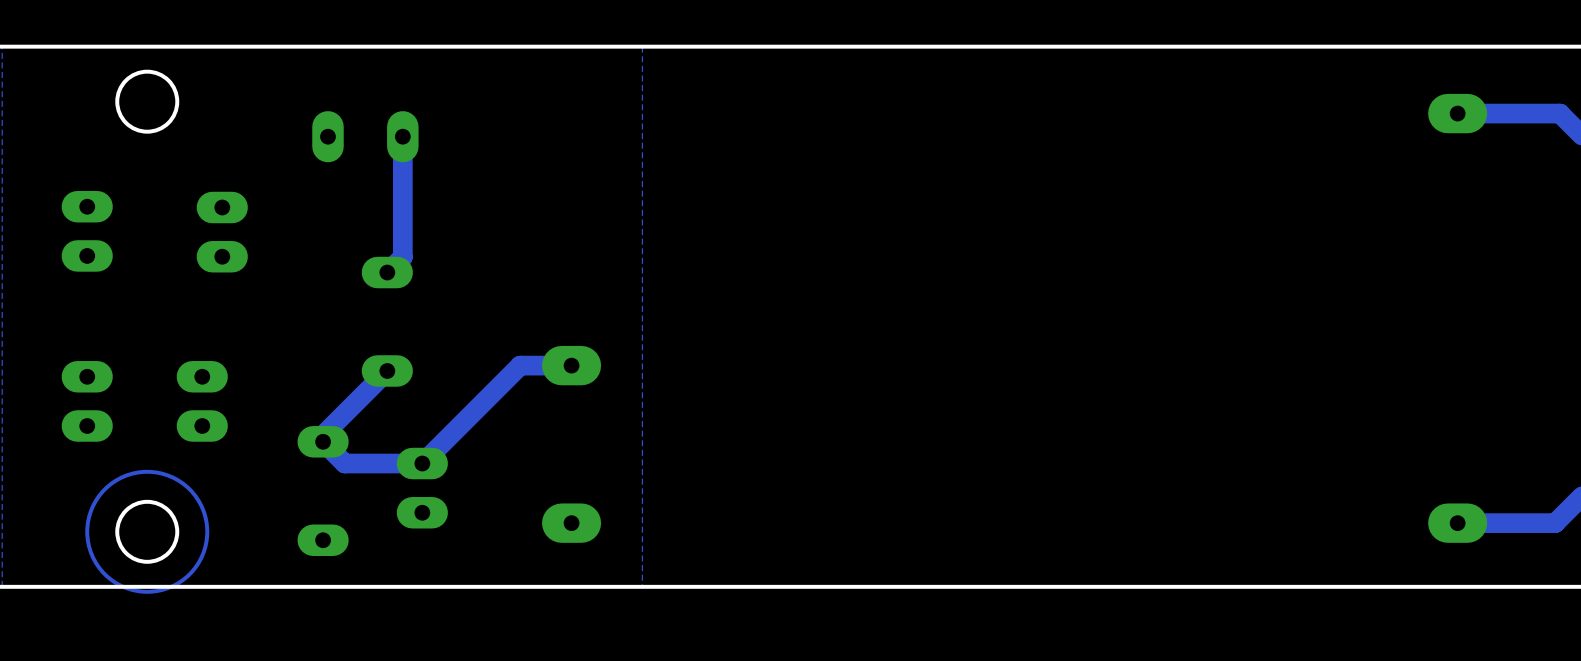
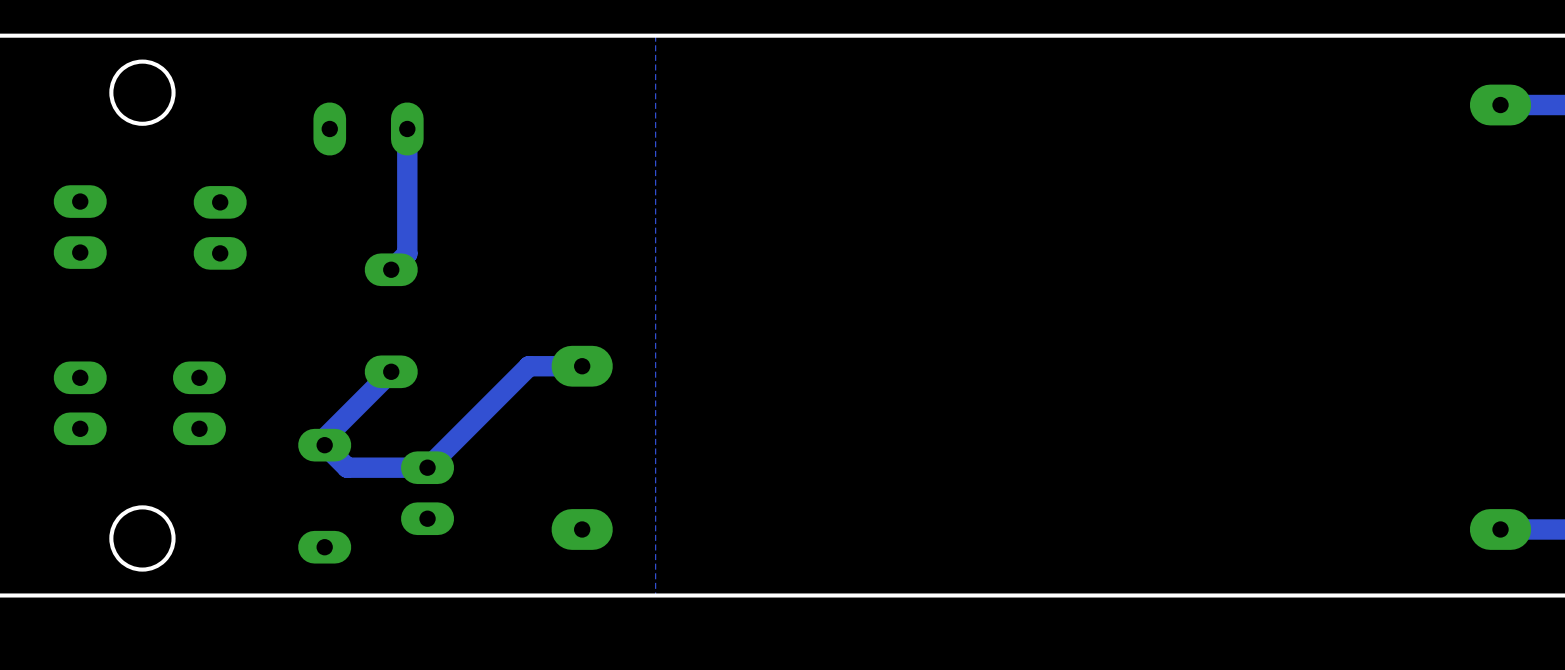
drawing: [85, 469, 210, 594] -> none

